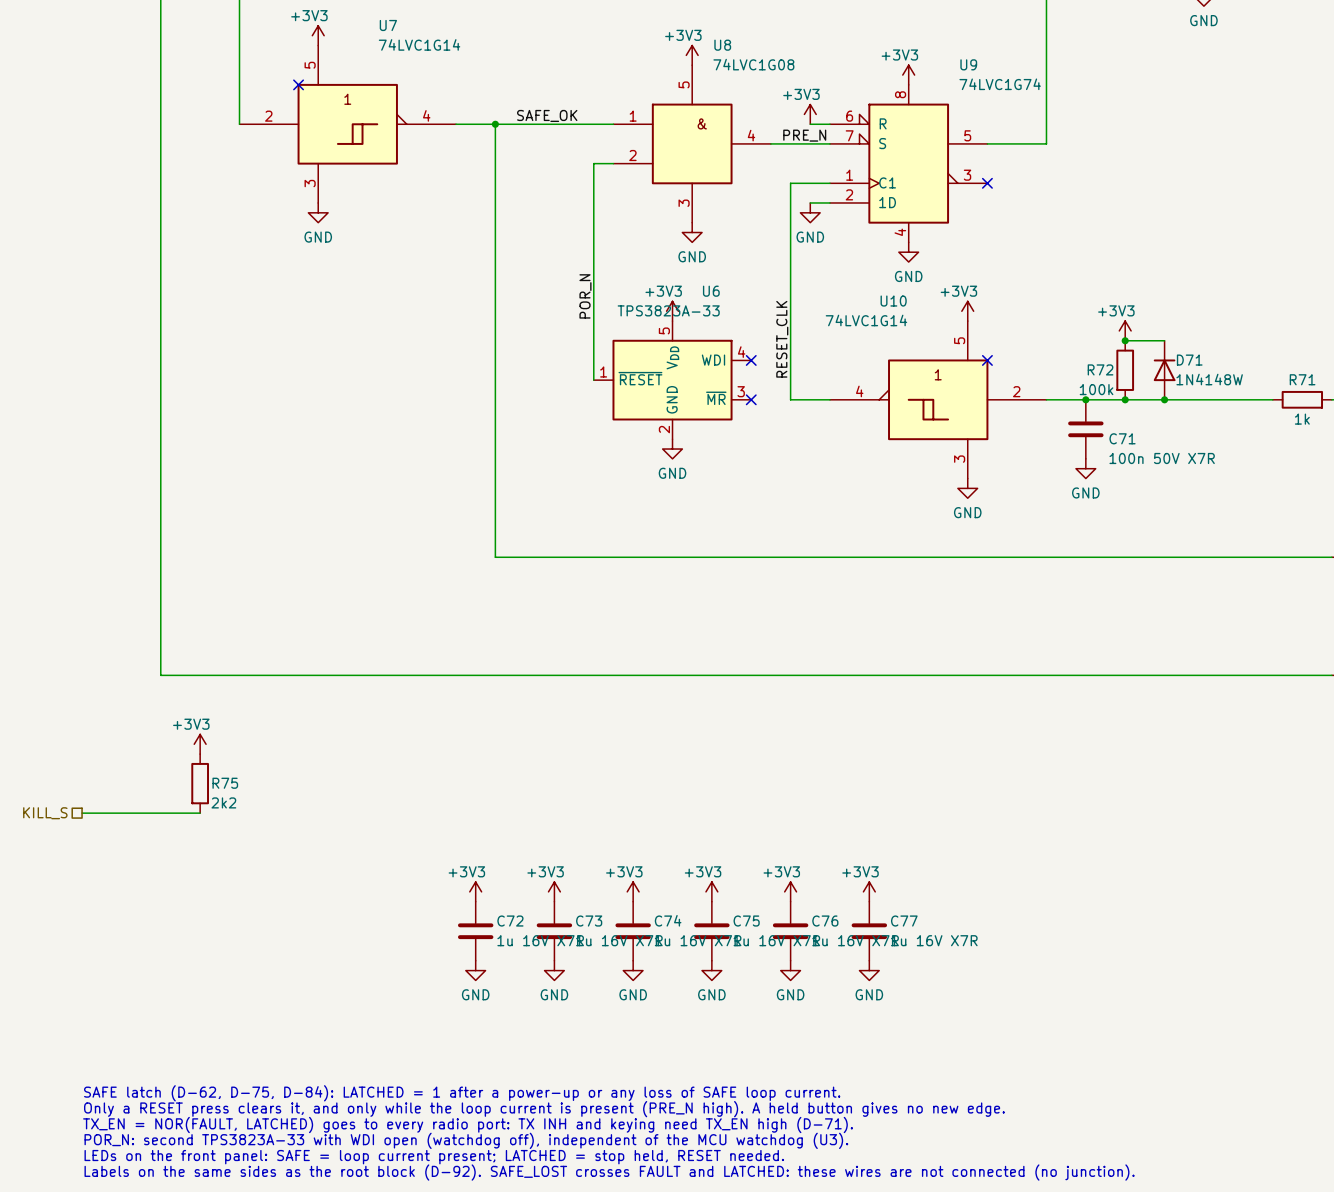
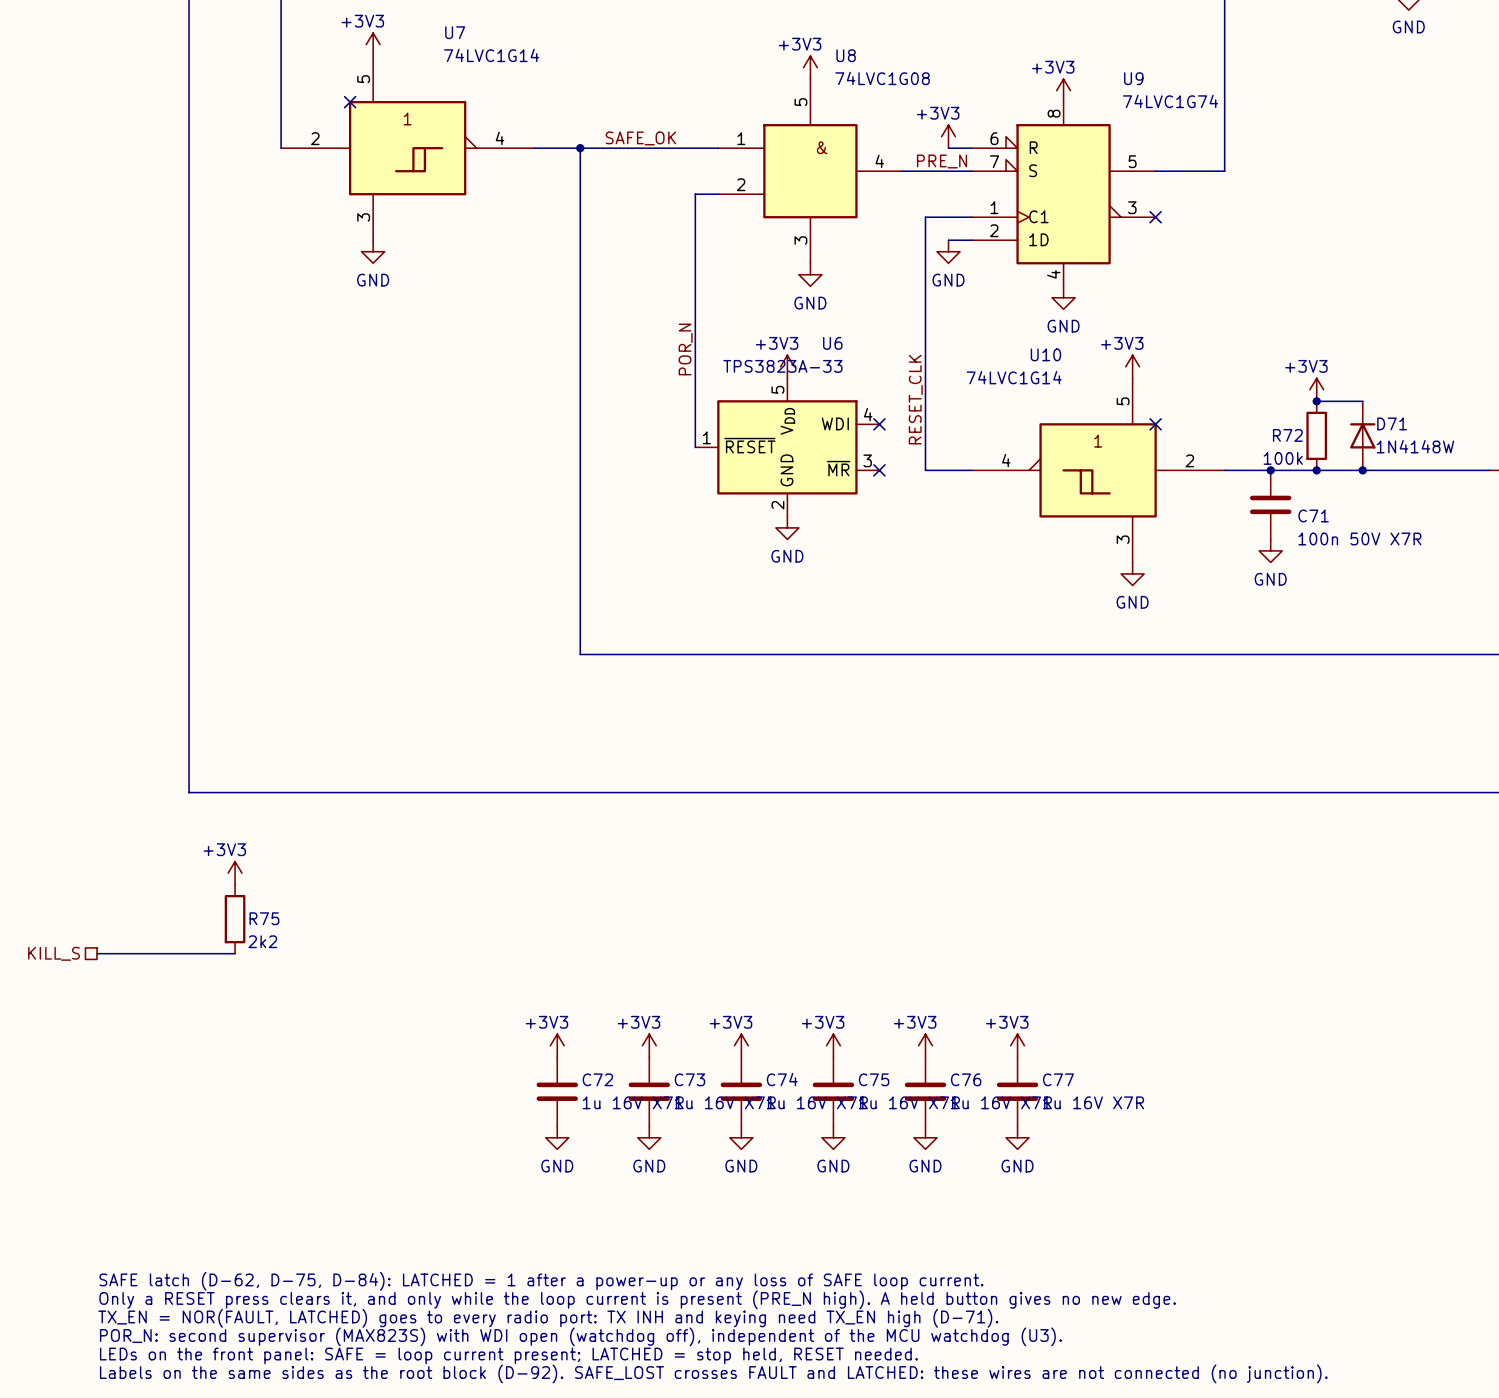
text: POR_N: second TPS3823A-33 with WDI open (watchdog off), independent of the MCU watchdog (U3). (466, 1140) -> POR_N: second supervisor (MAX823S) with WDI open (watchdog off), independent of the MCU watchdog (U3). (580, 1336)

